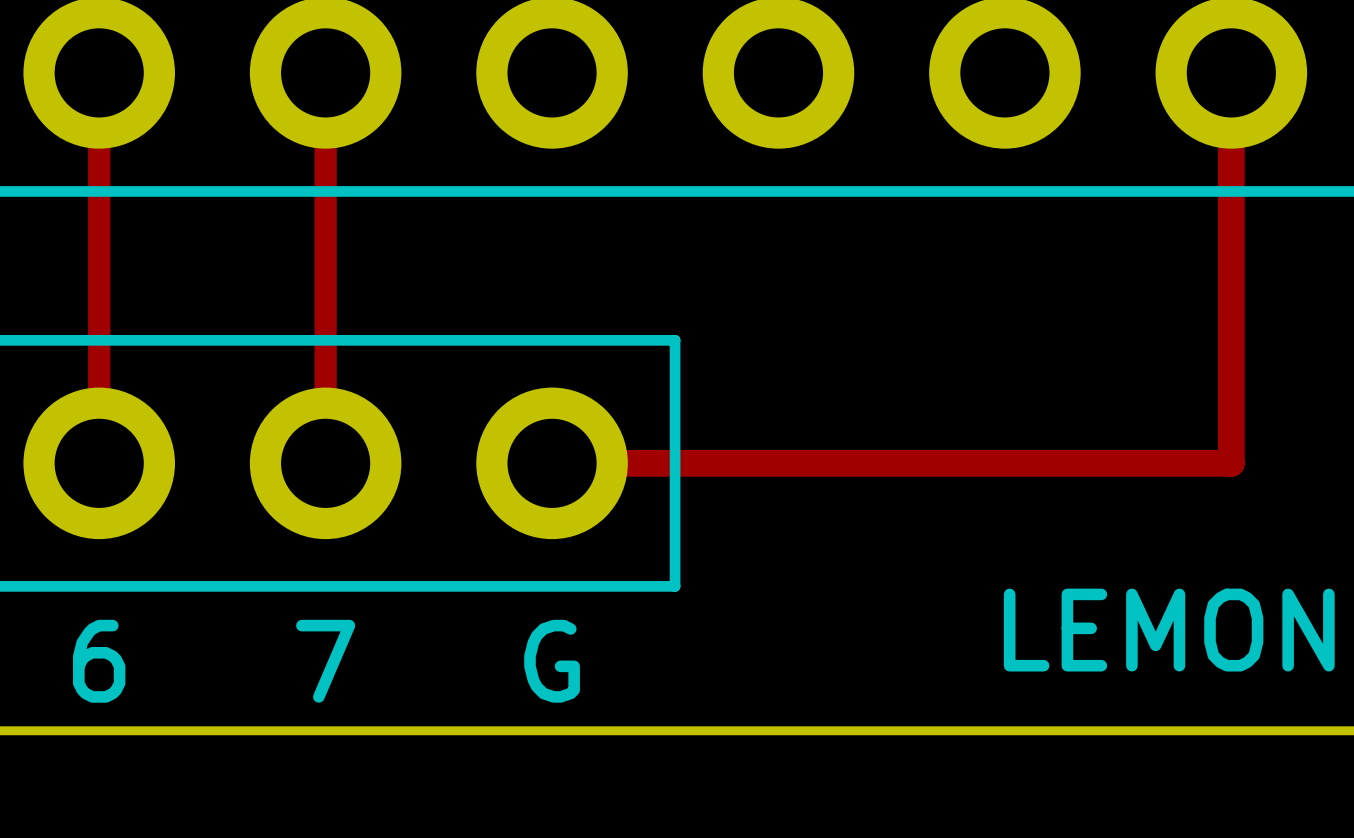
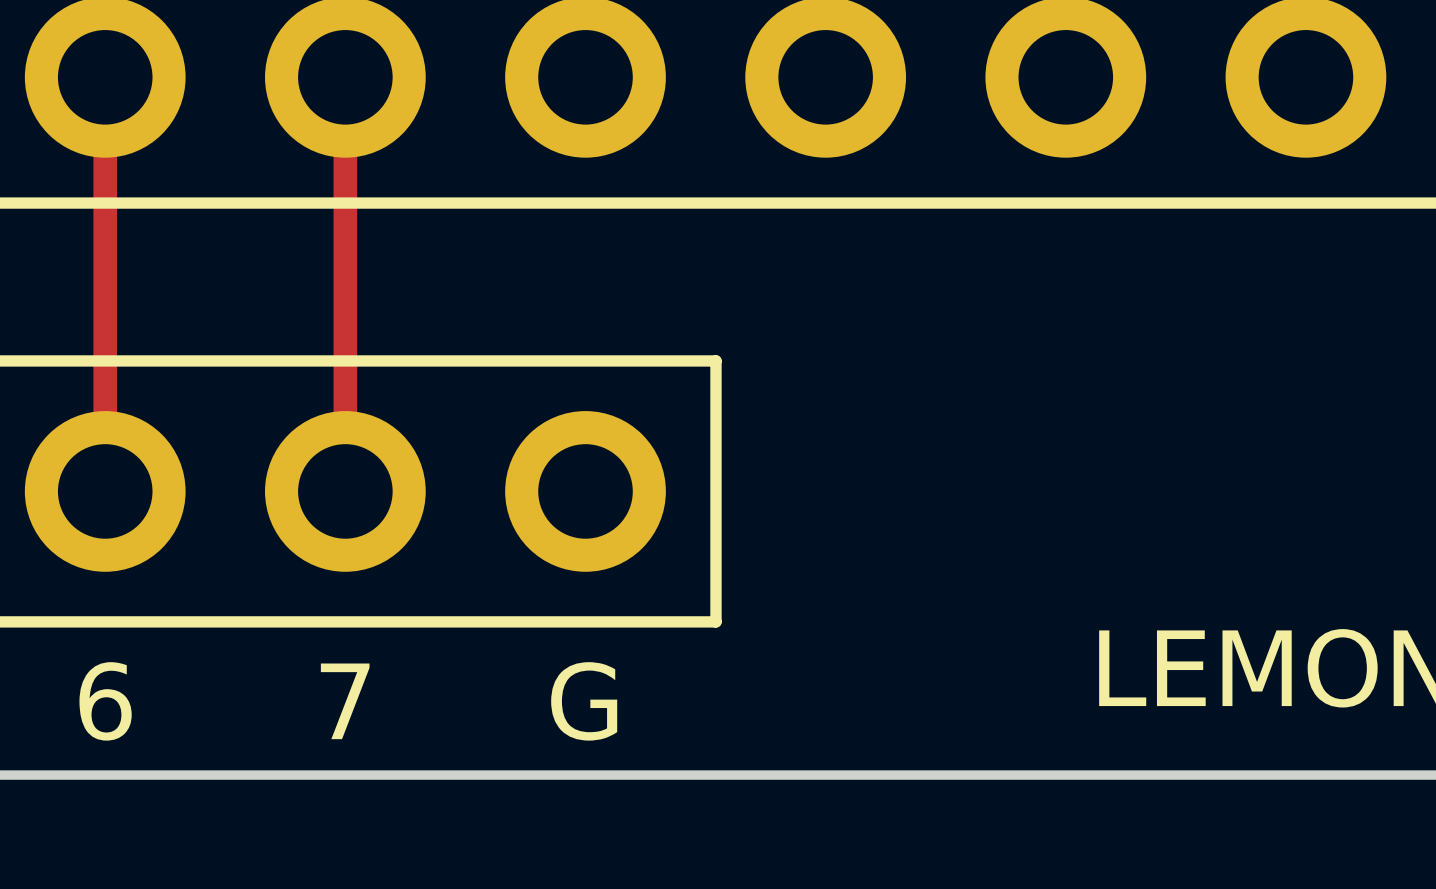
track: (1231, 72) (1231, 463) (552, 463) -> none

